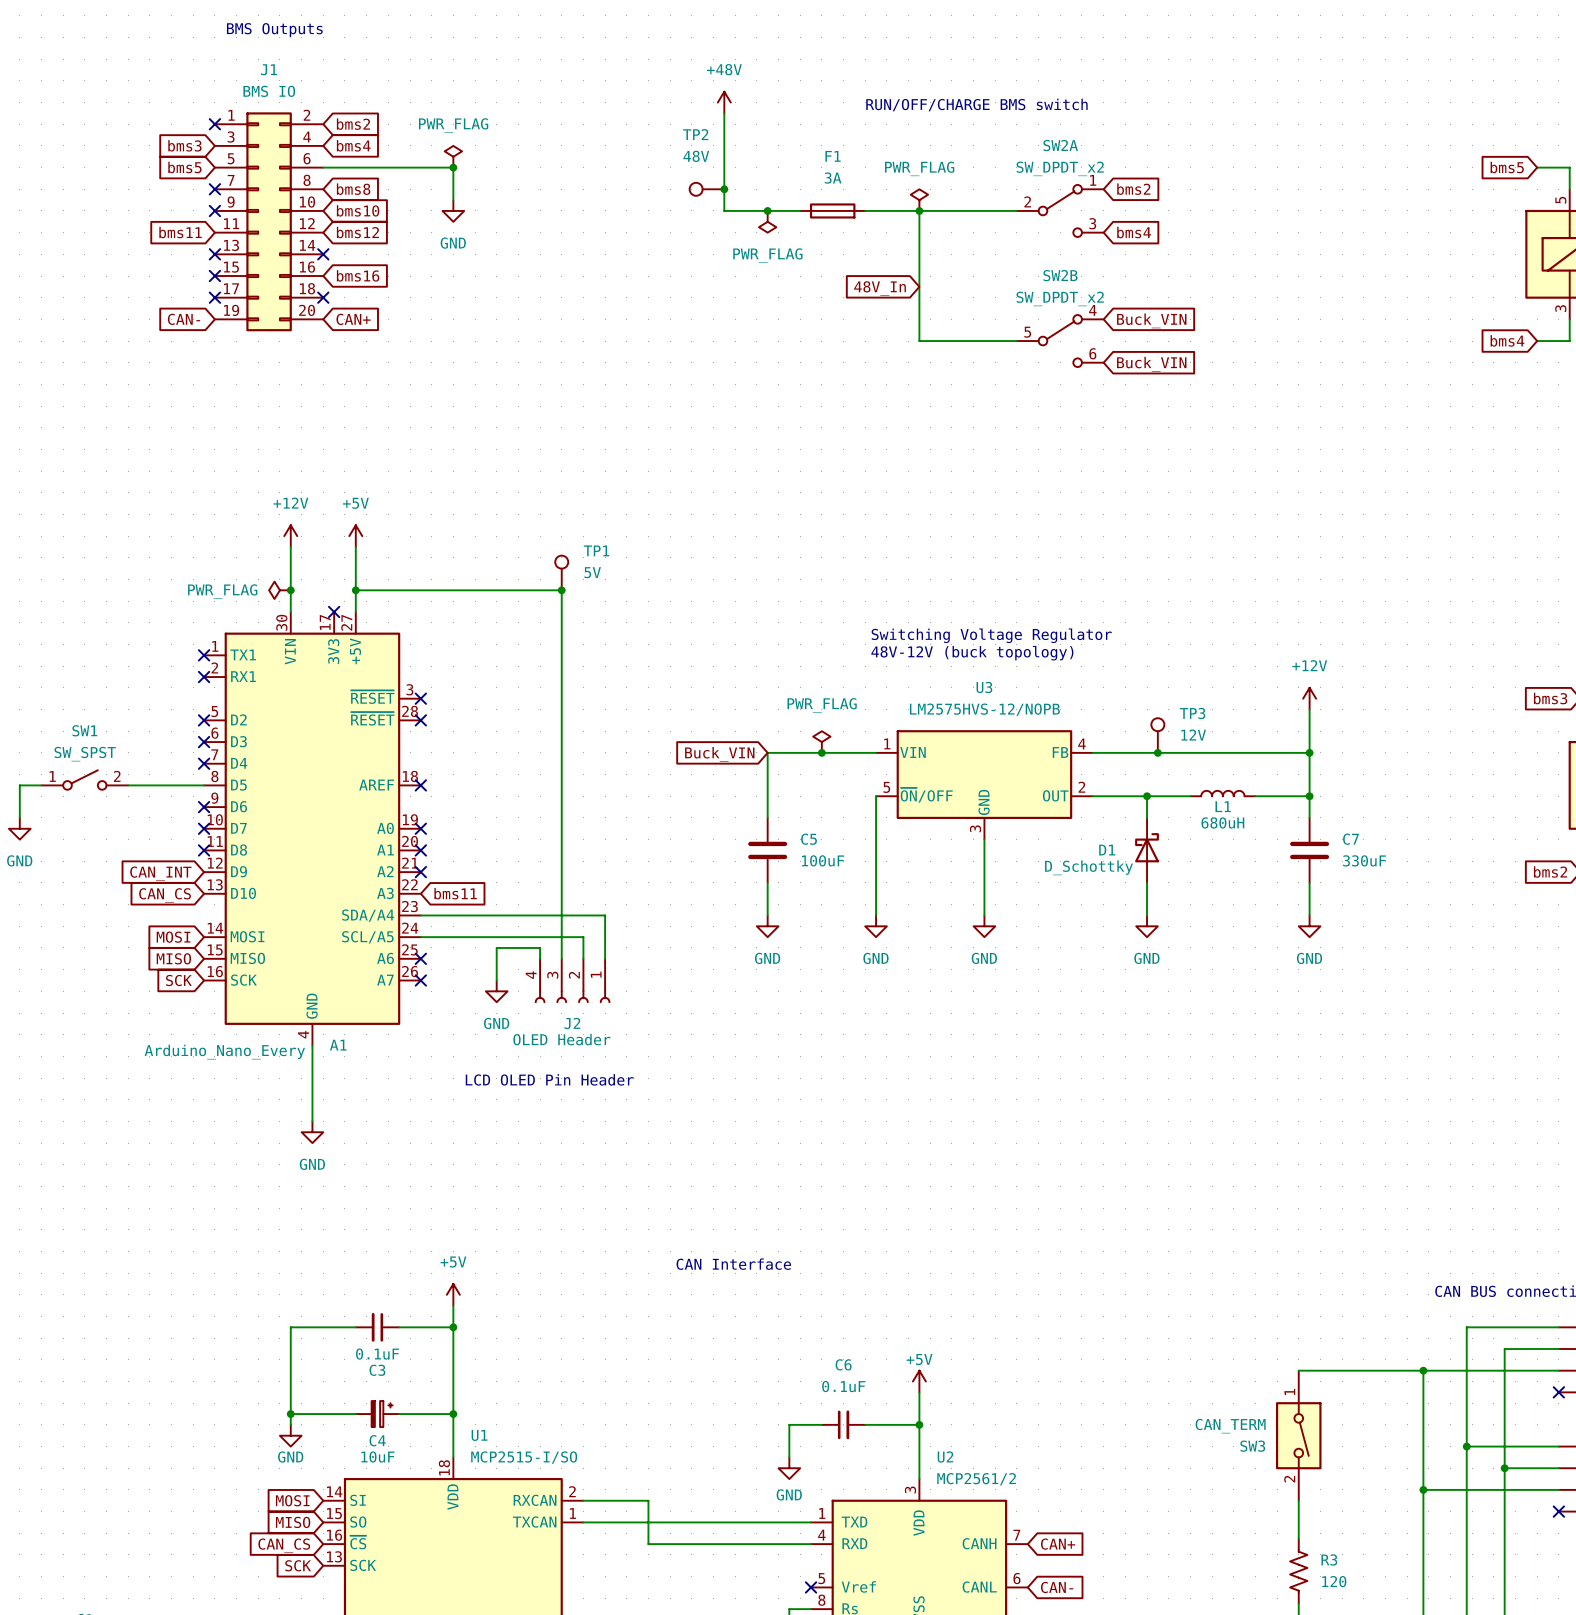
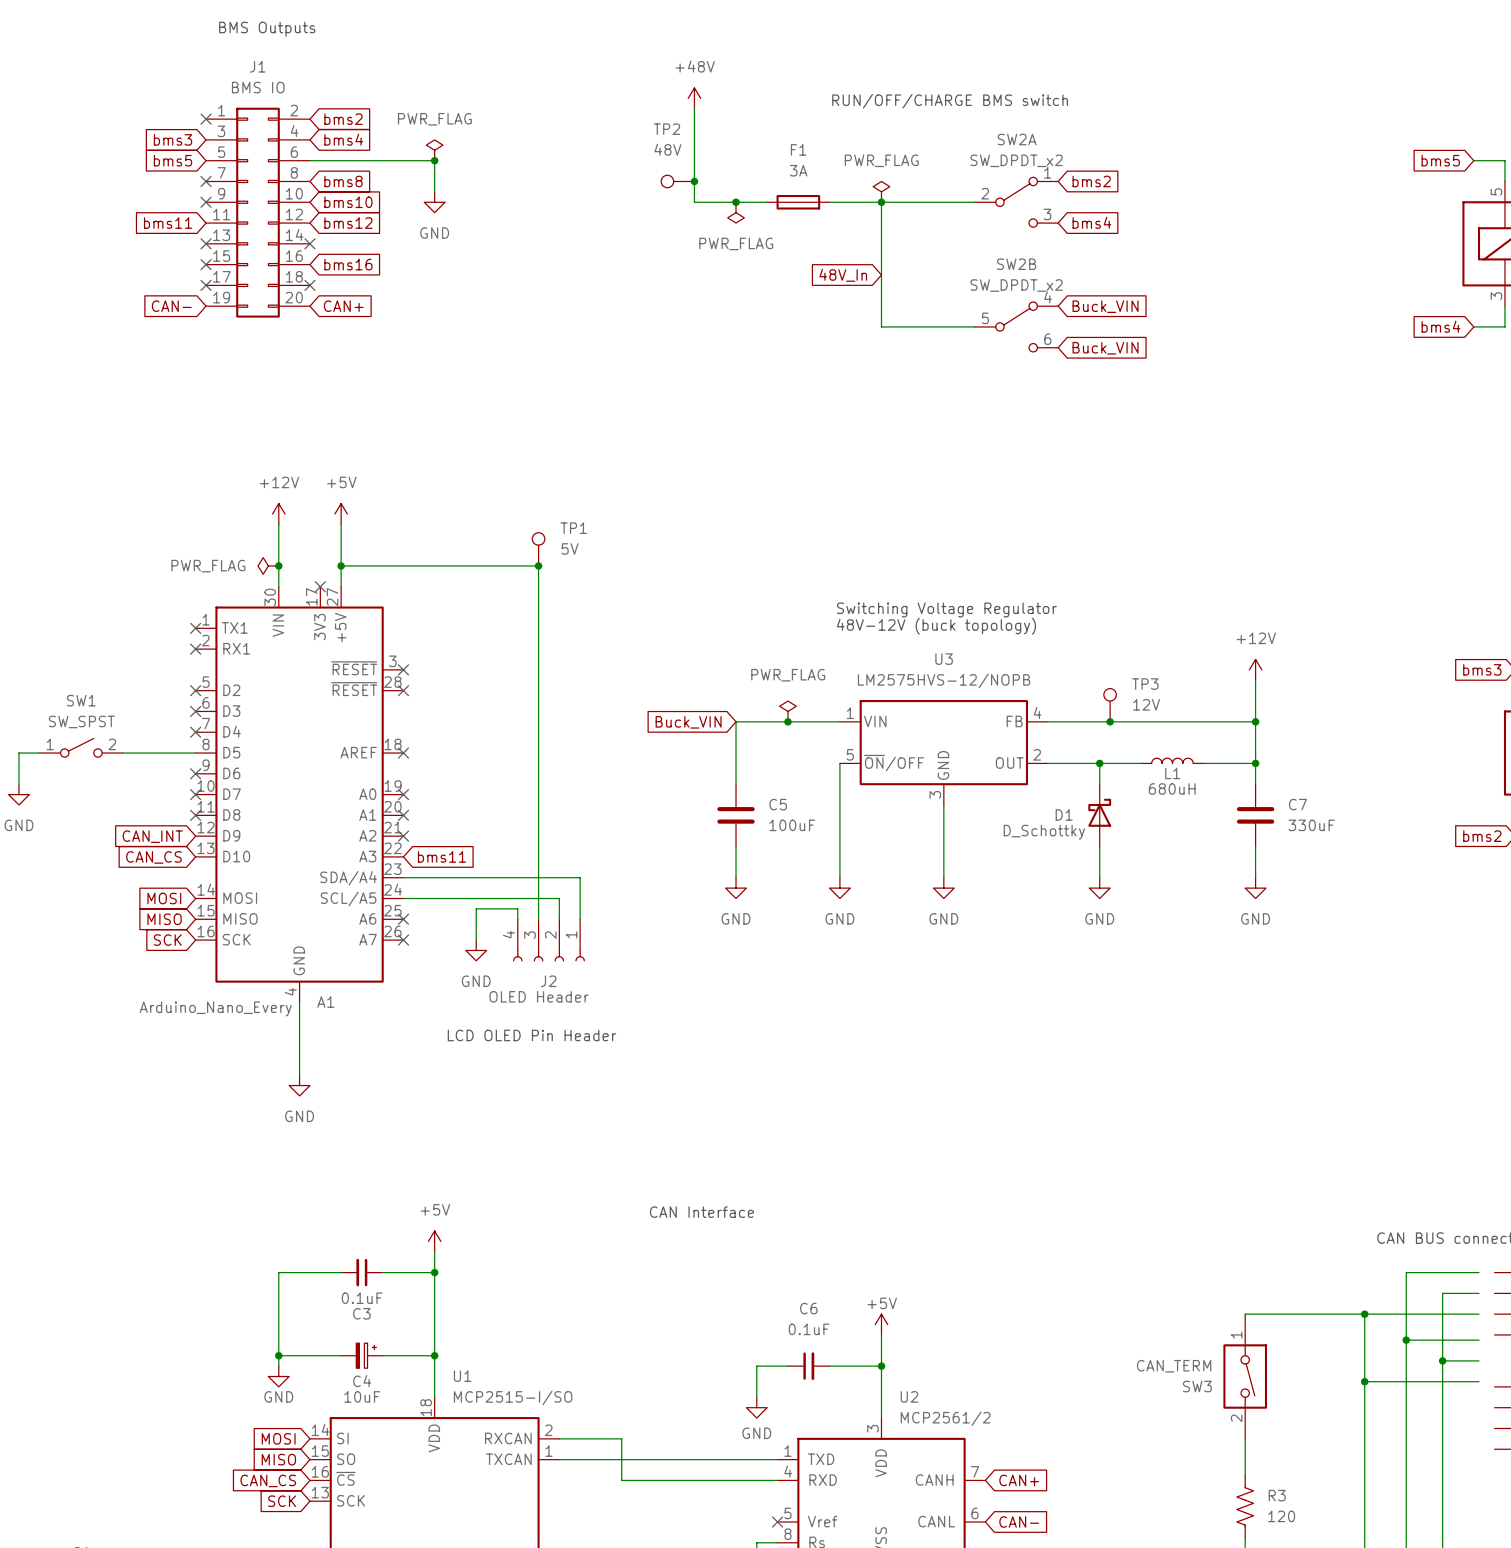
wire: (1542, 1327) (1558, 1327) -> none
wire: (1542, 1349) (1558, 1349) -> none
wire: (1542, 1370) (1558, 1370) -> none
no-connect mark: (1558, 1392) -> none
wire: none -> (1406, 1340) (1479, 1340)
junction: none -> (1406, 1340)
wire: none -> (1442, 1360) (1479, 1360)
junction: none -> (1442, 1360)
wire: none -> (1364, 1381) (1479, 1381)
junction: none -> (1364, 1381)
wire: (1466, 1446) (1558, 1446) -> none
junction: (1466, 1446) -> none
wire: (1504, 1468) (1558, 1468) -> none
junction: (1504, 1468) -> none
wire: (1423, 1489) (1558, 1489) -> none
junction: (1423, 1489) -> none
no-connect mark: (1558, 1511) -> none

